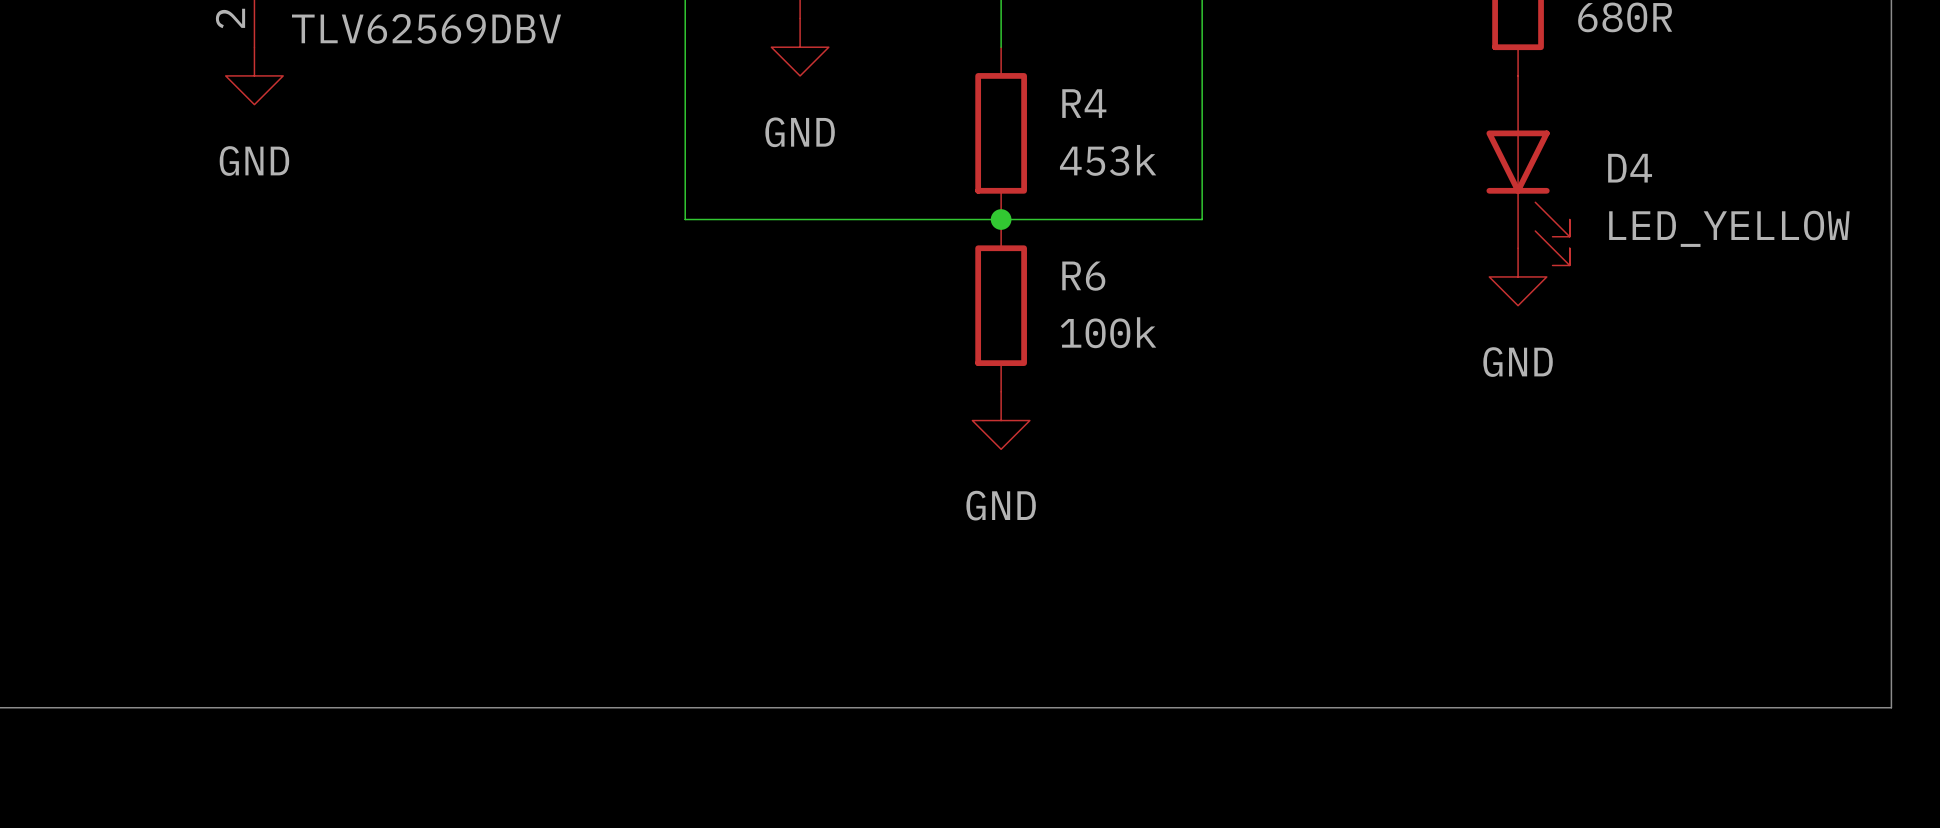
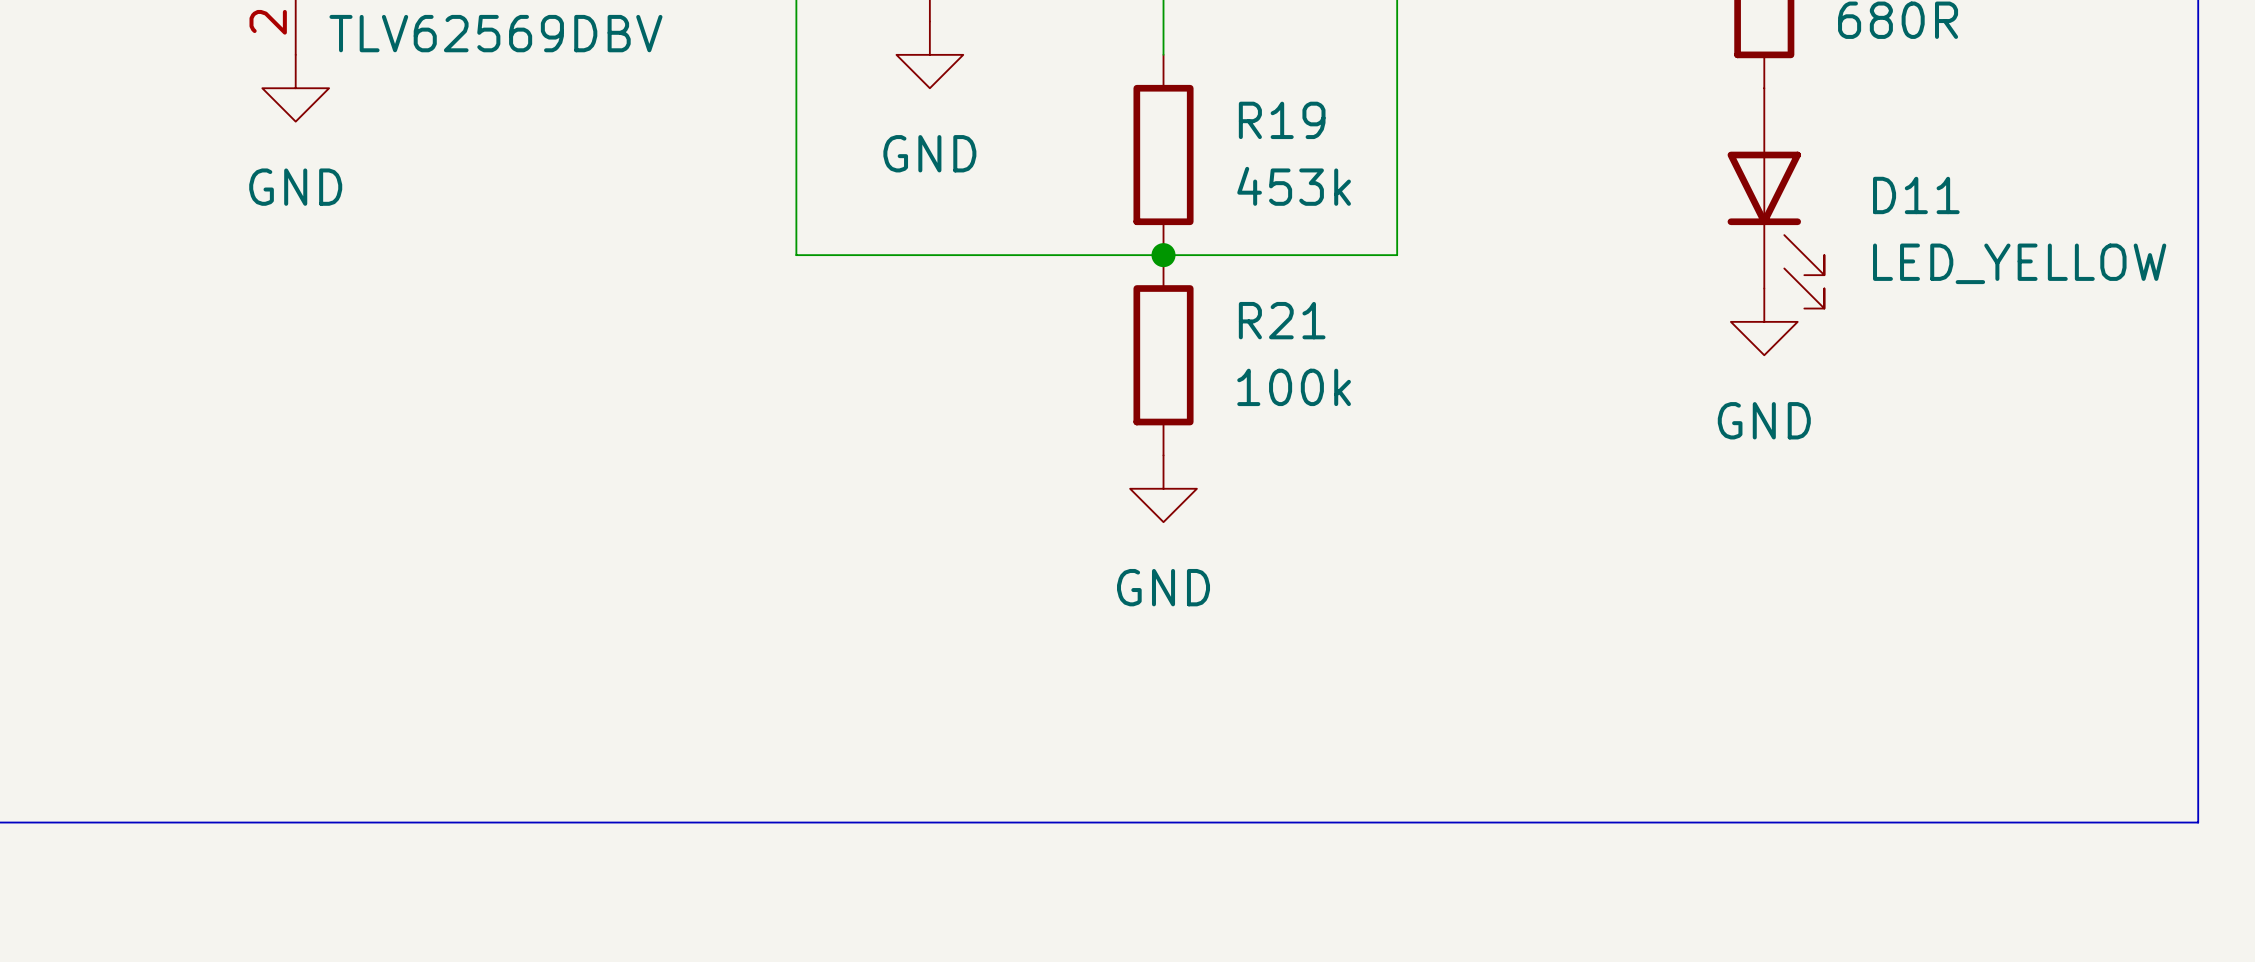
R4 name: R4 (1084, 103) -> R19 (1282, 120)
D4 name: D4 (1630, 168) -> D11 (1916, 195)
R6 name: R6 (1083, 276) -> R21 (1282, 320)

